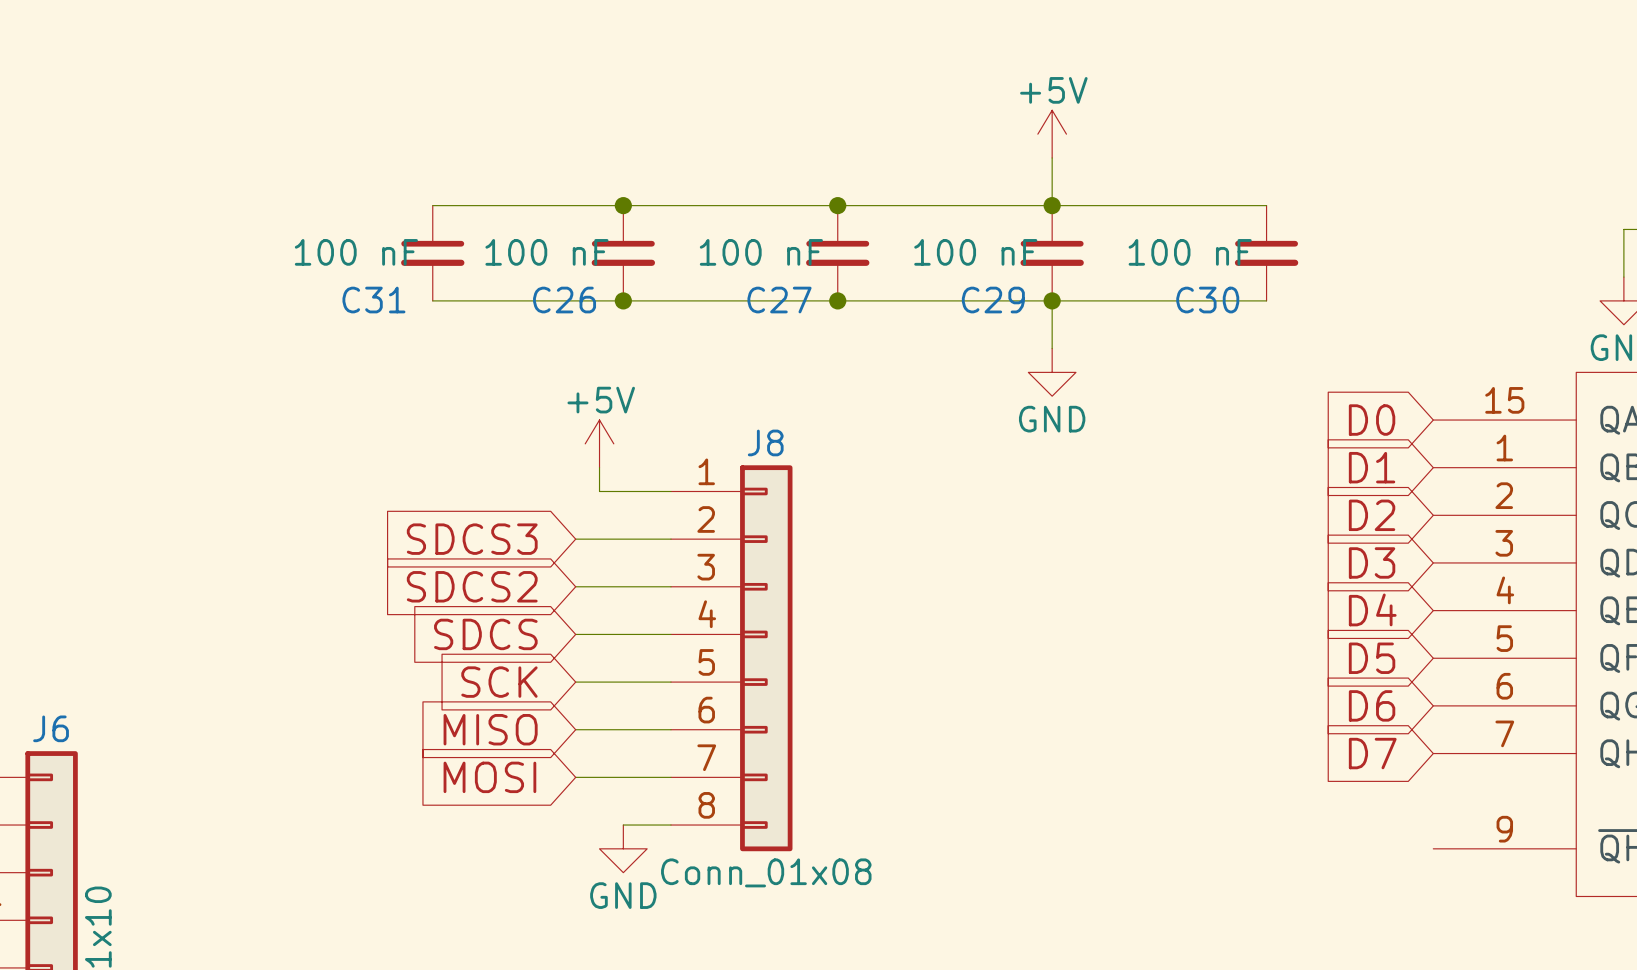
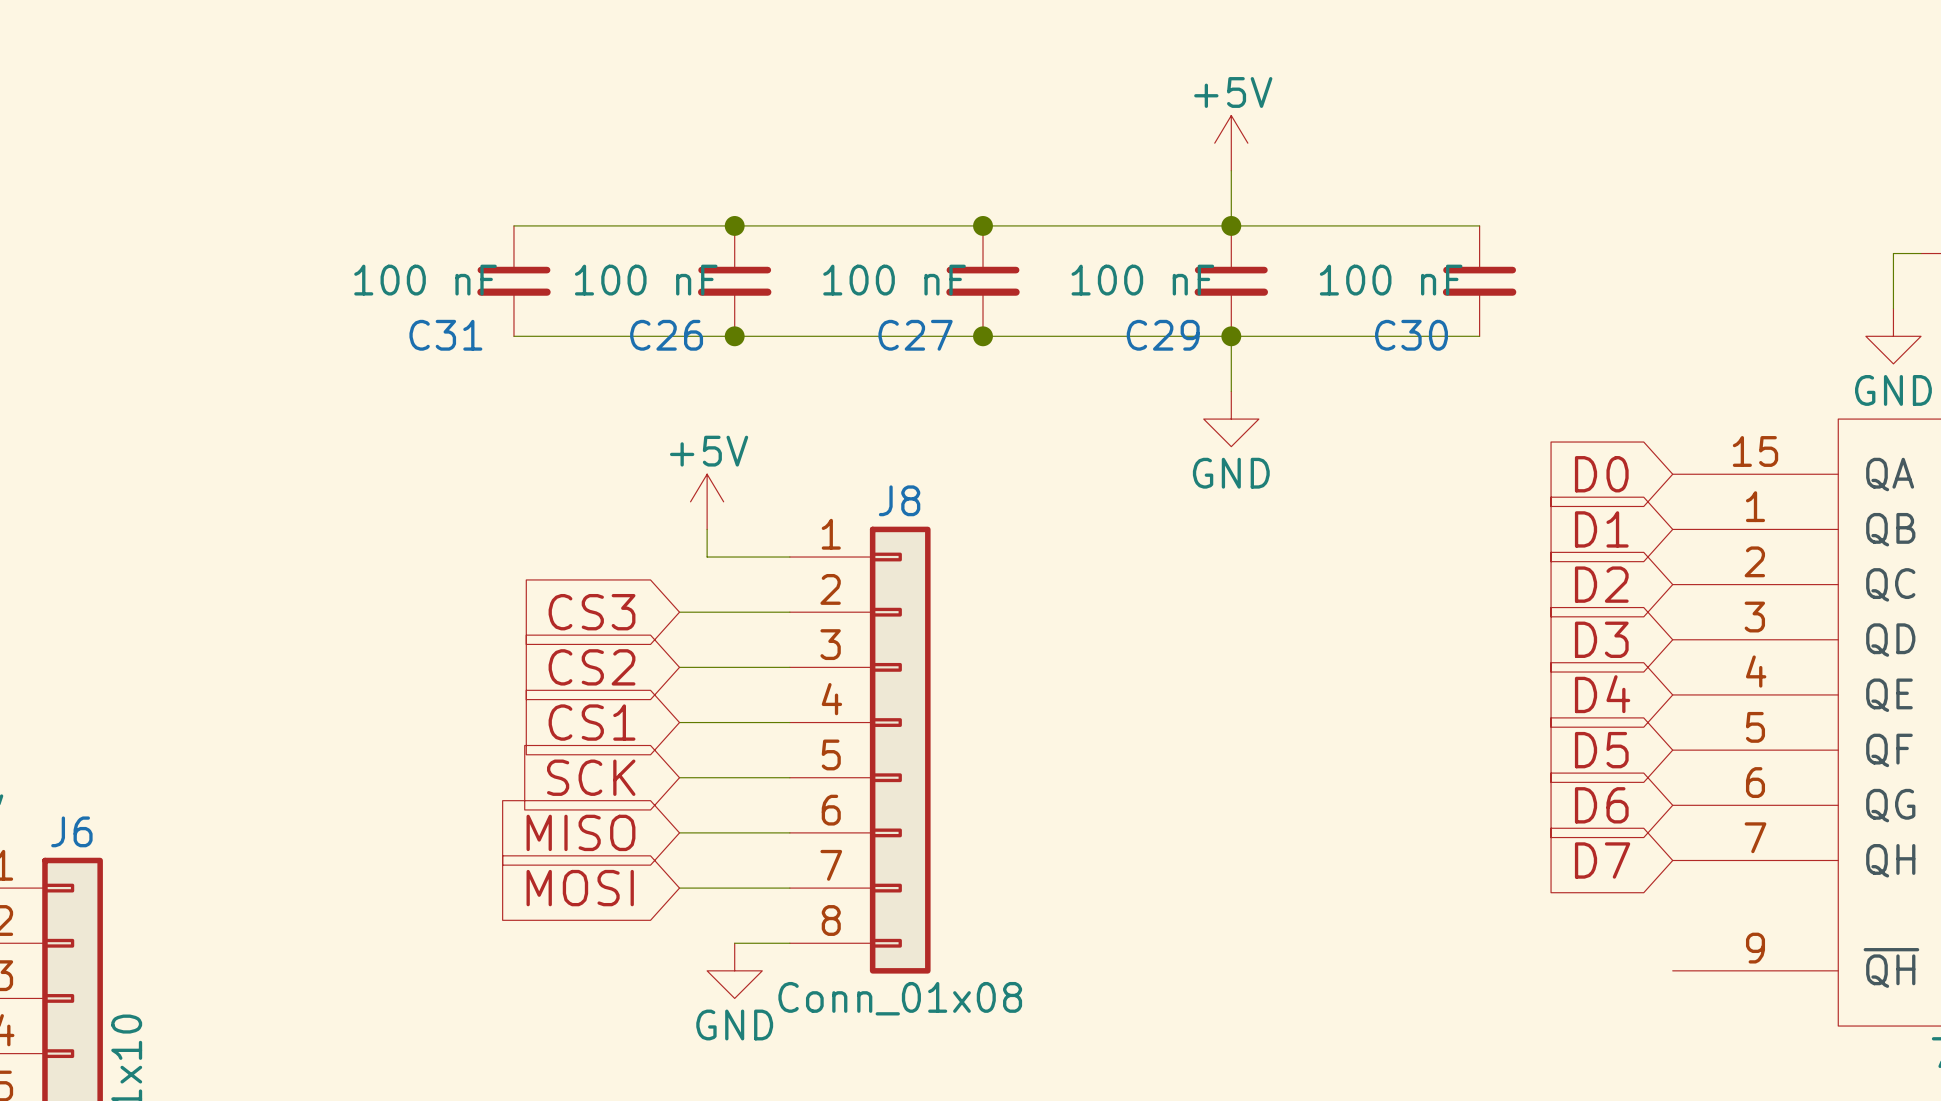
global label: SDCS3 (472, 539) -> CS3 (592, 612)
global label: SDCS2 (472, 586) -> CS2 (592, 667)
global label: SDCS (485, 634) -> CS1 (592, 722)

